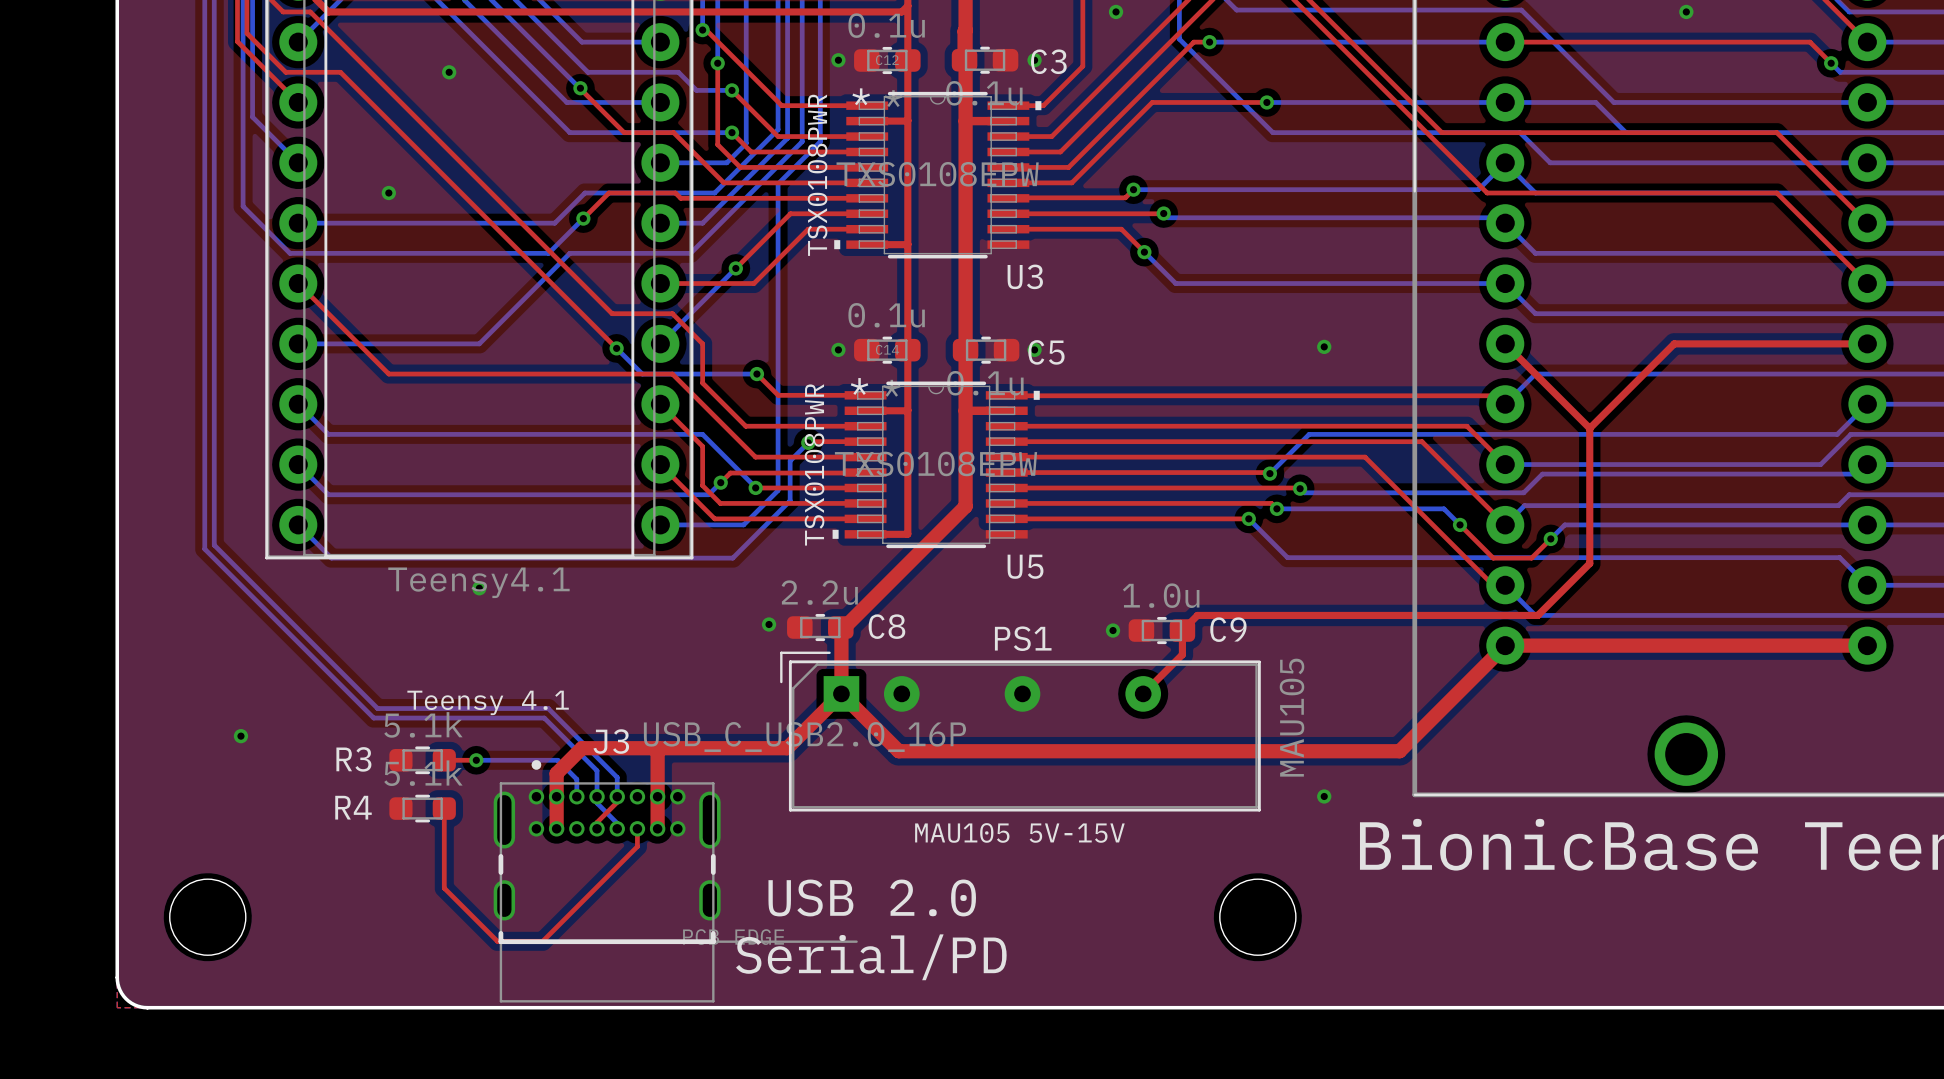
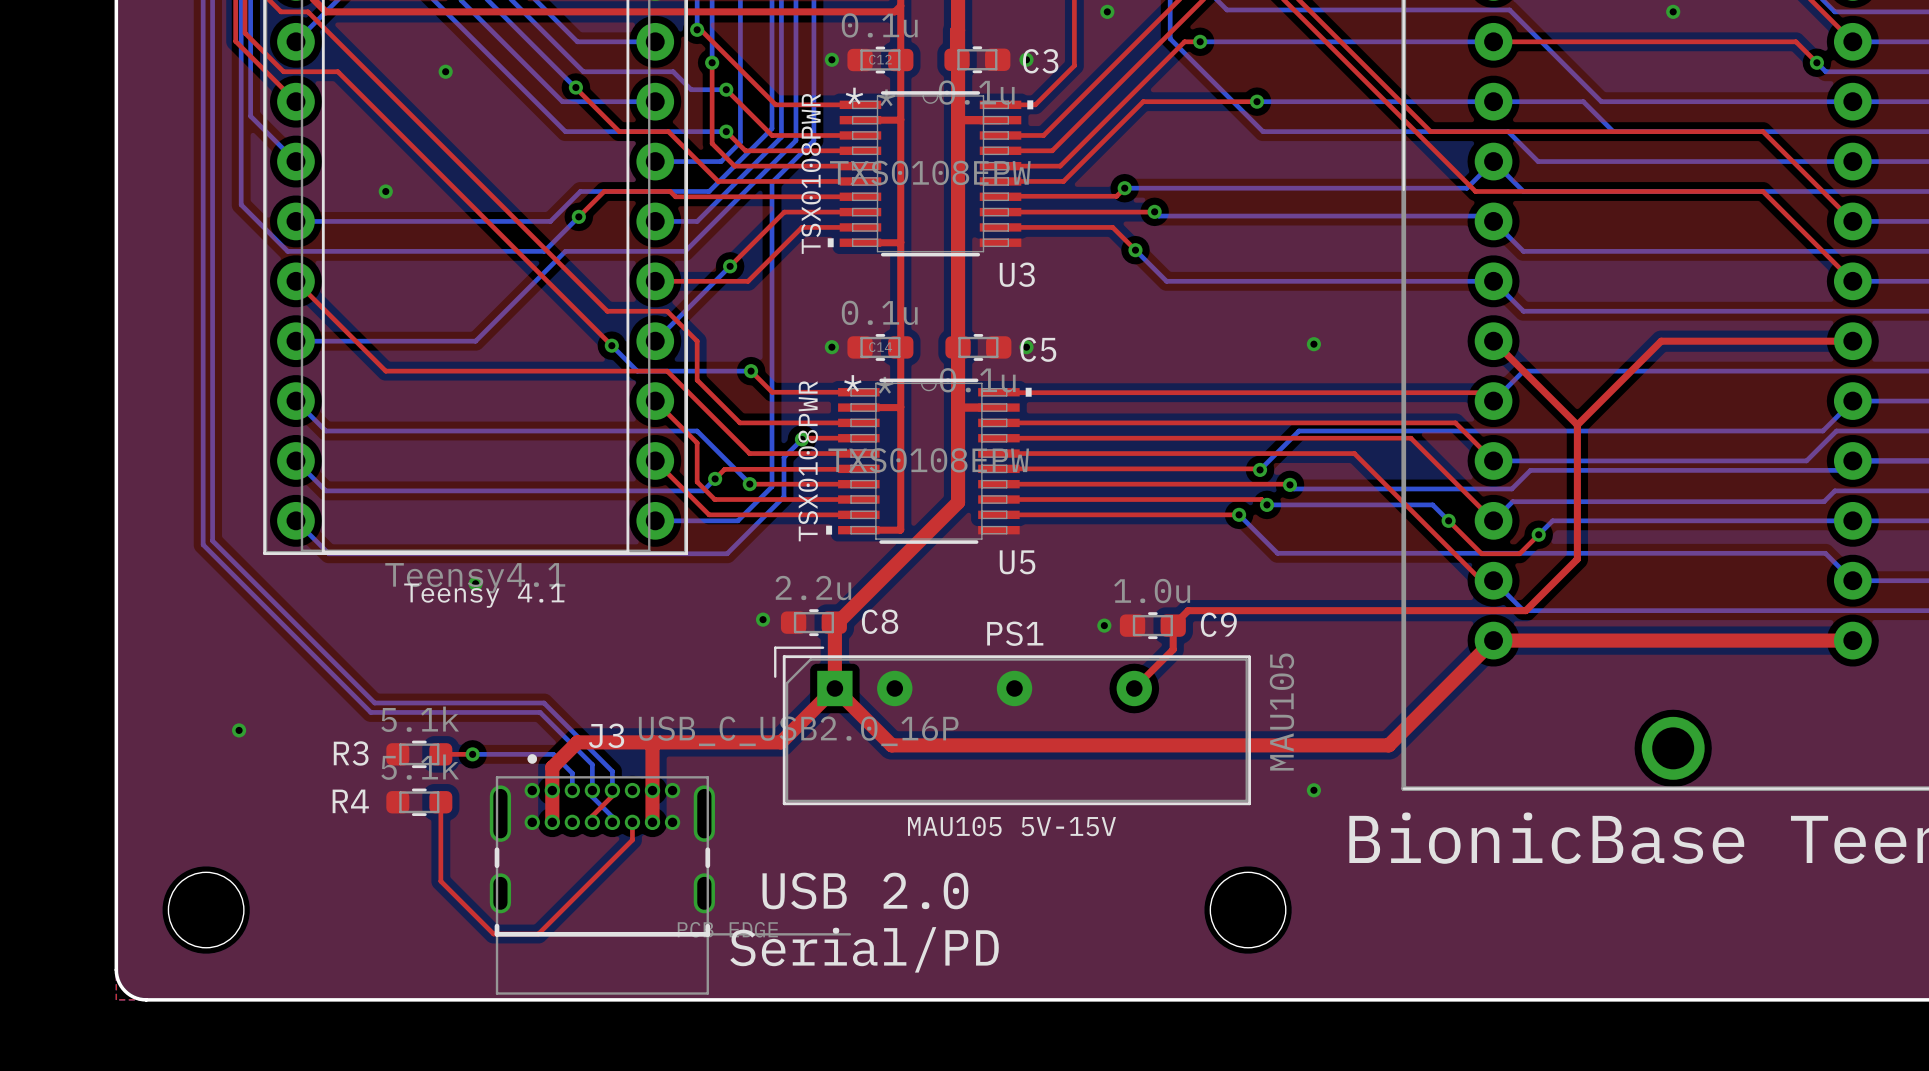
text position: Teensy 4.1 (488, 702) -> Teensy 4.1 (484, 595)

